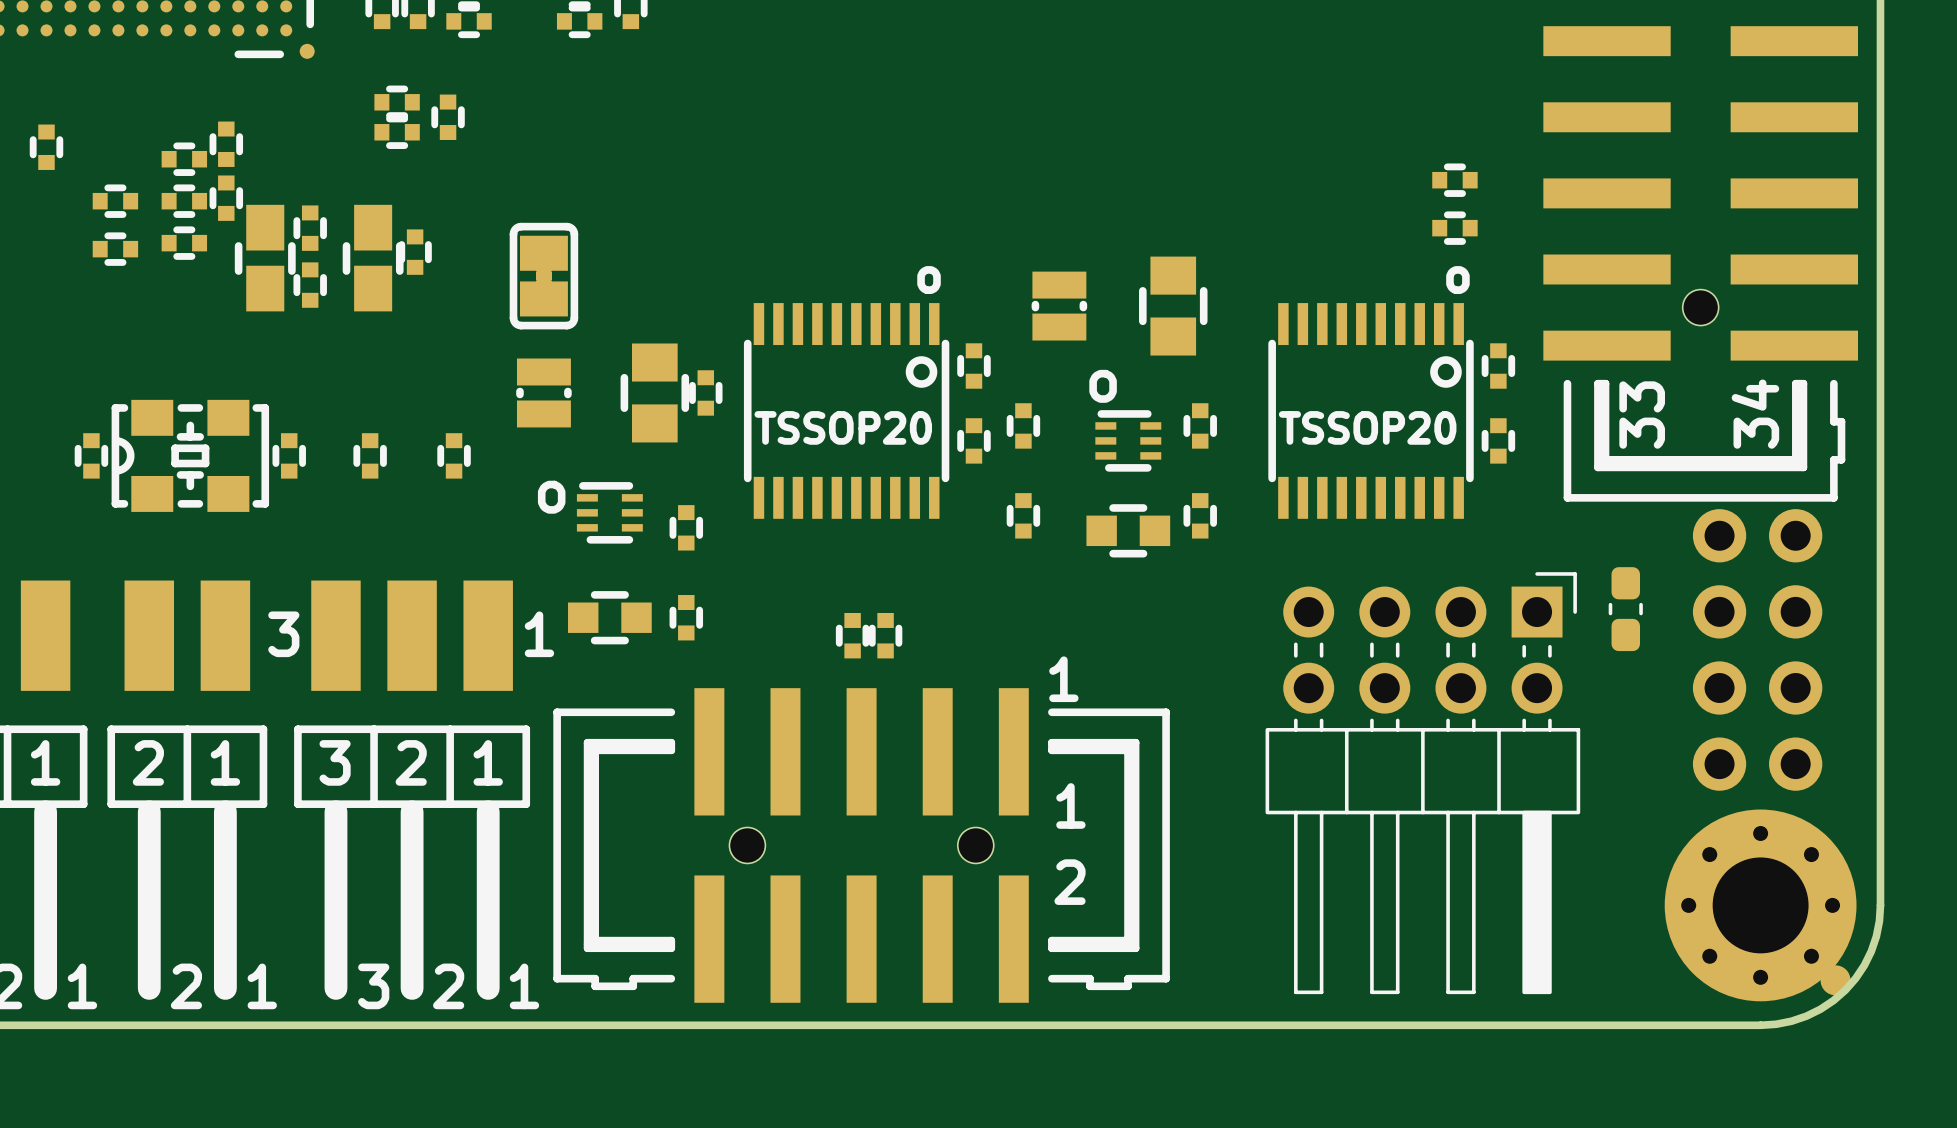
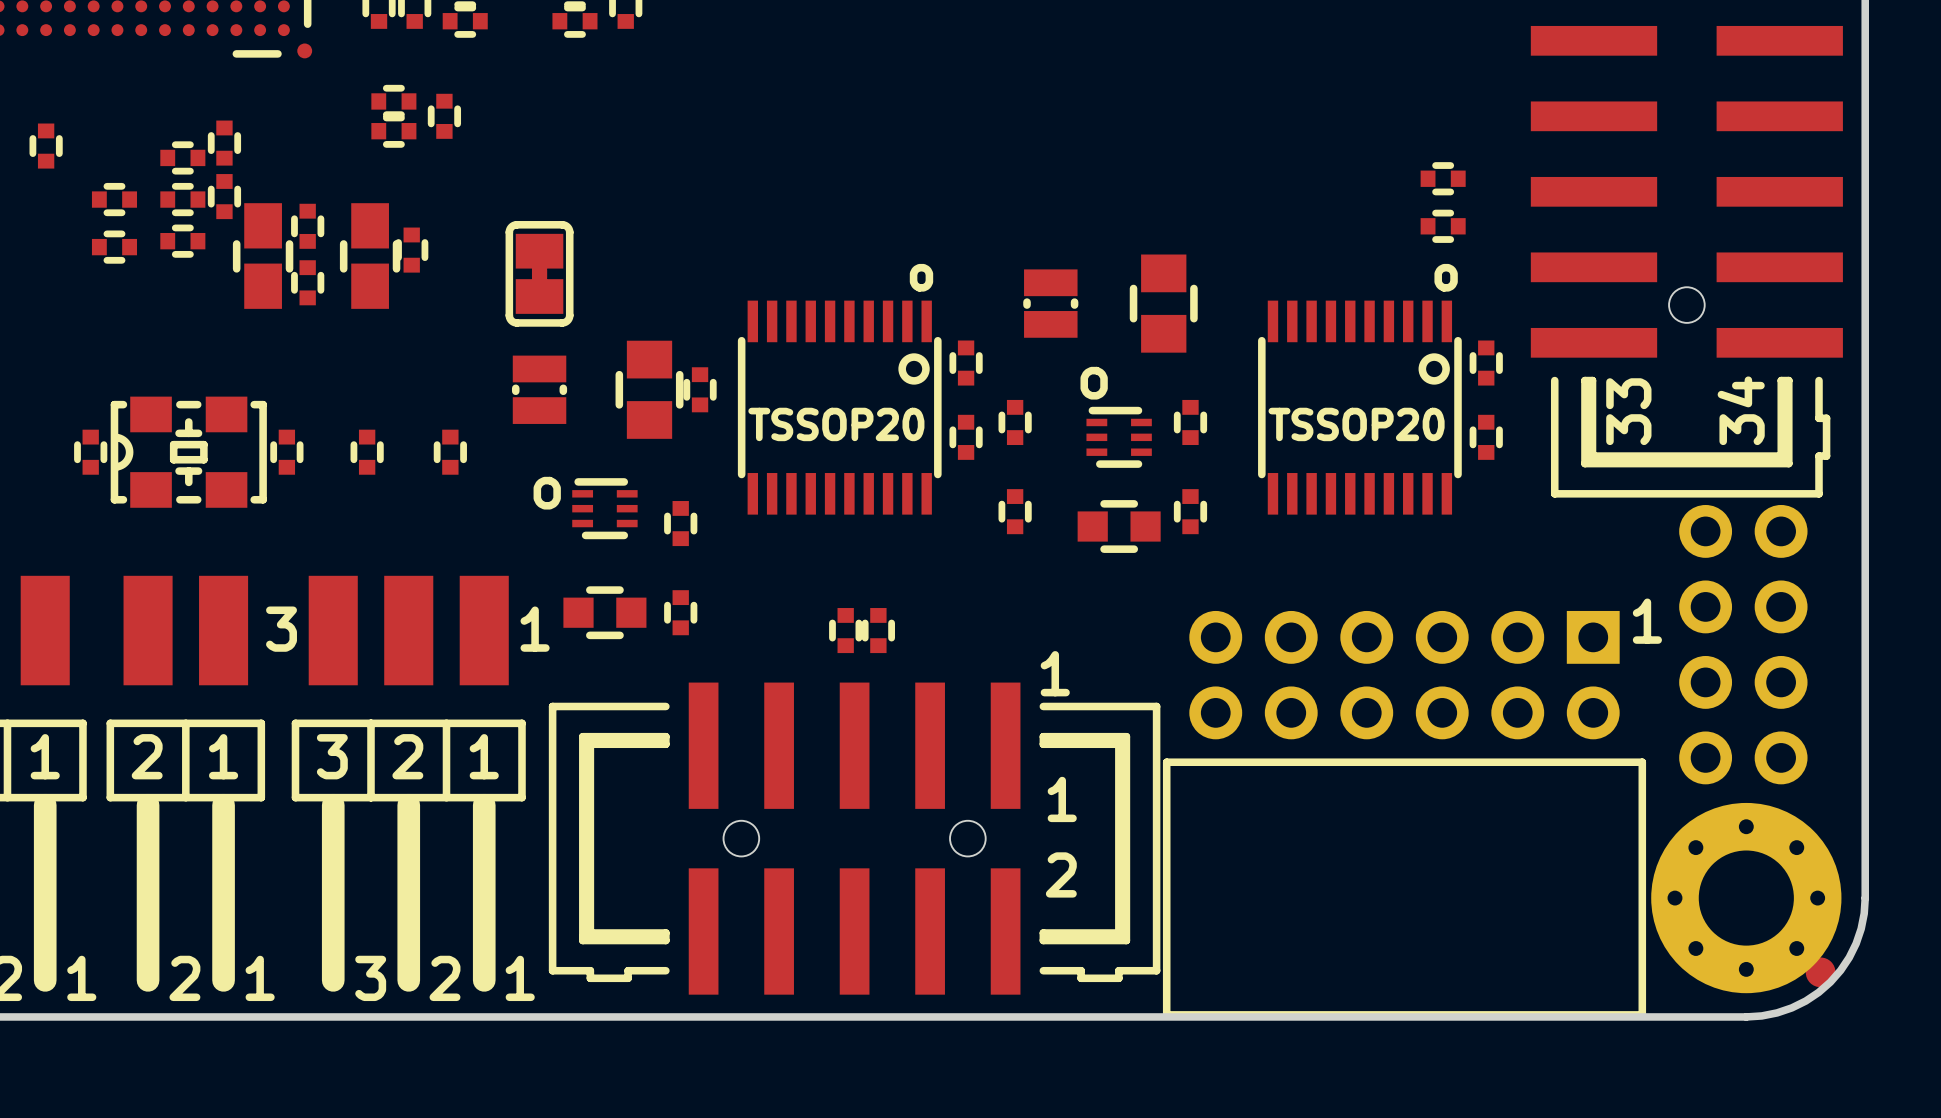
part: (1625, 609) -> none
part: (1422, 783) -> none
part: none -> (1404, 814)

